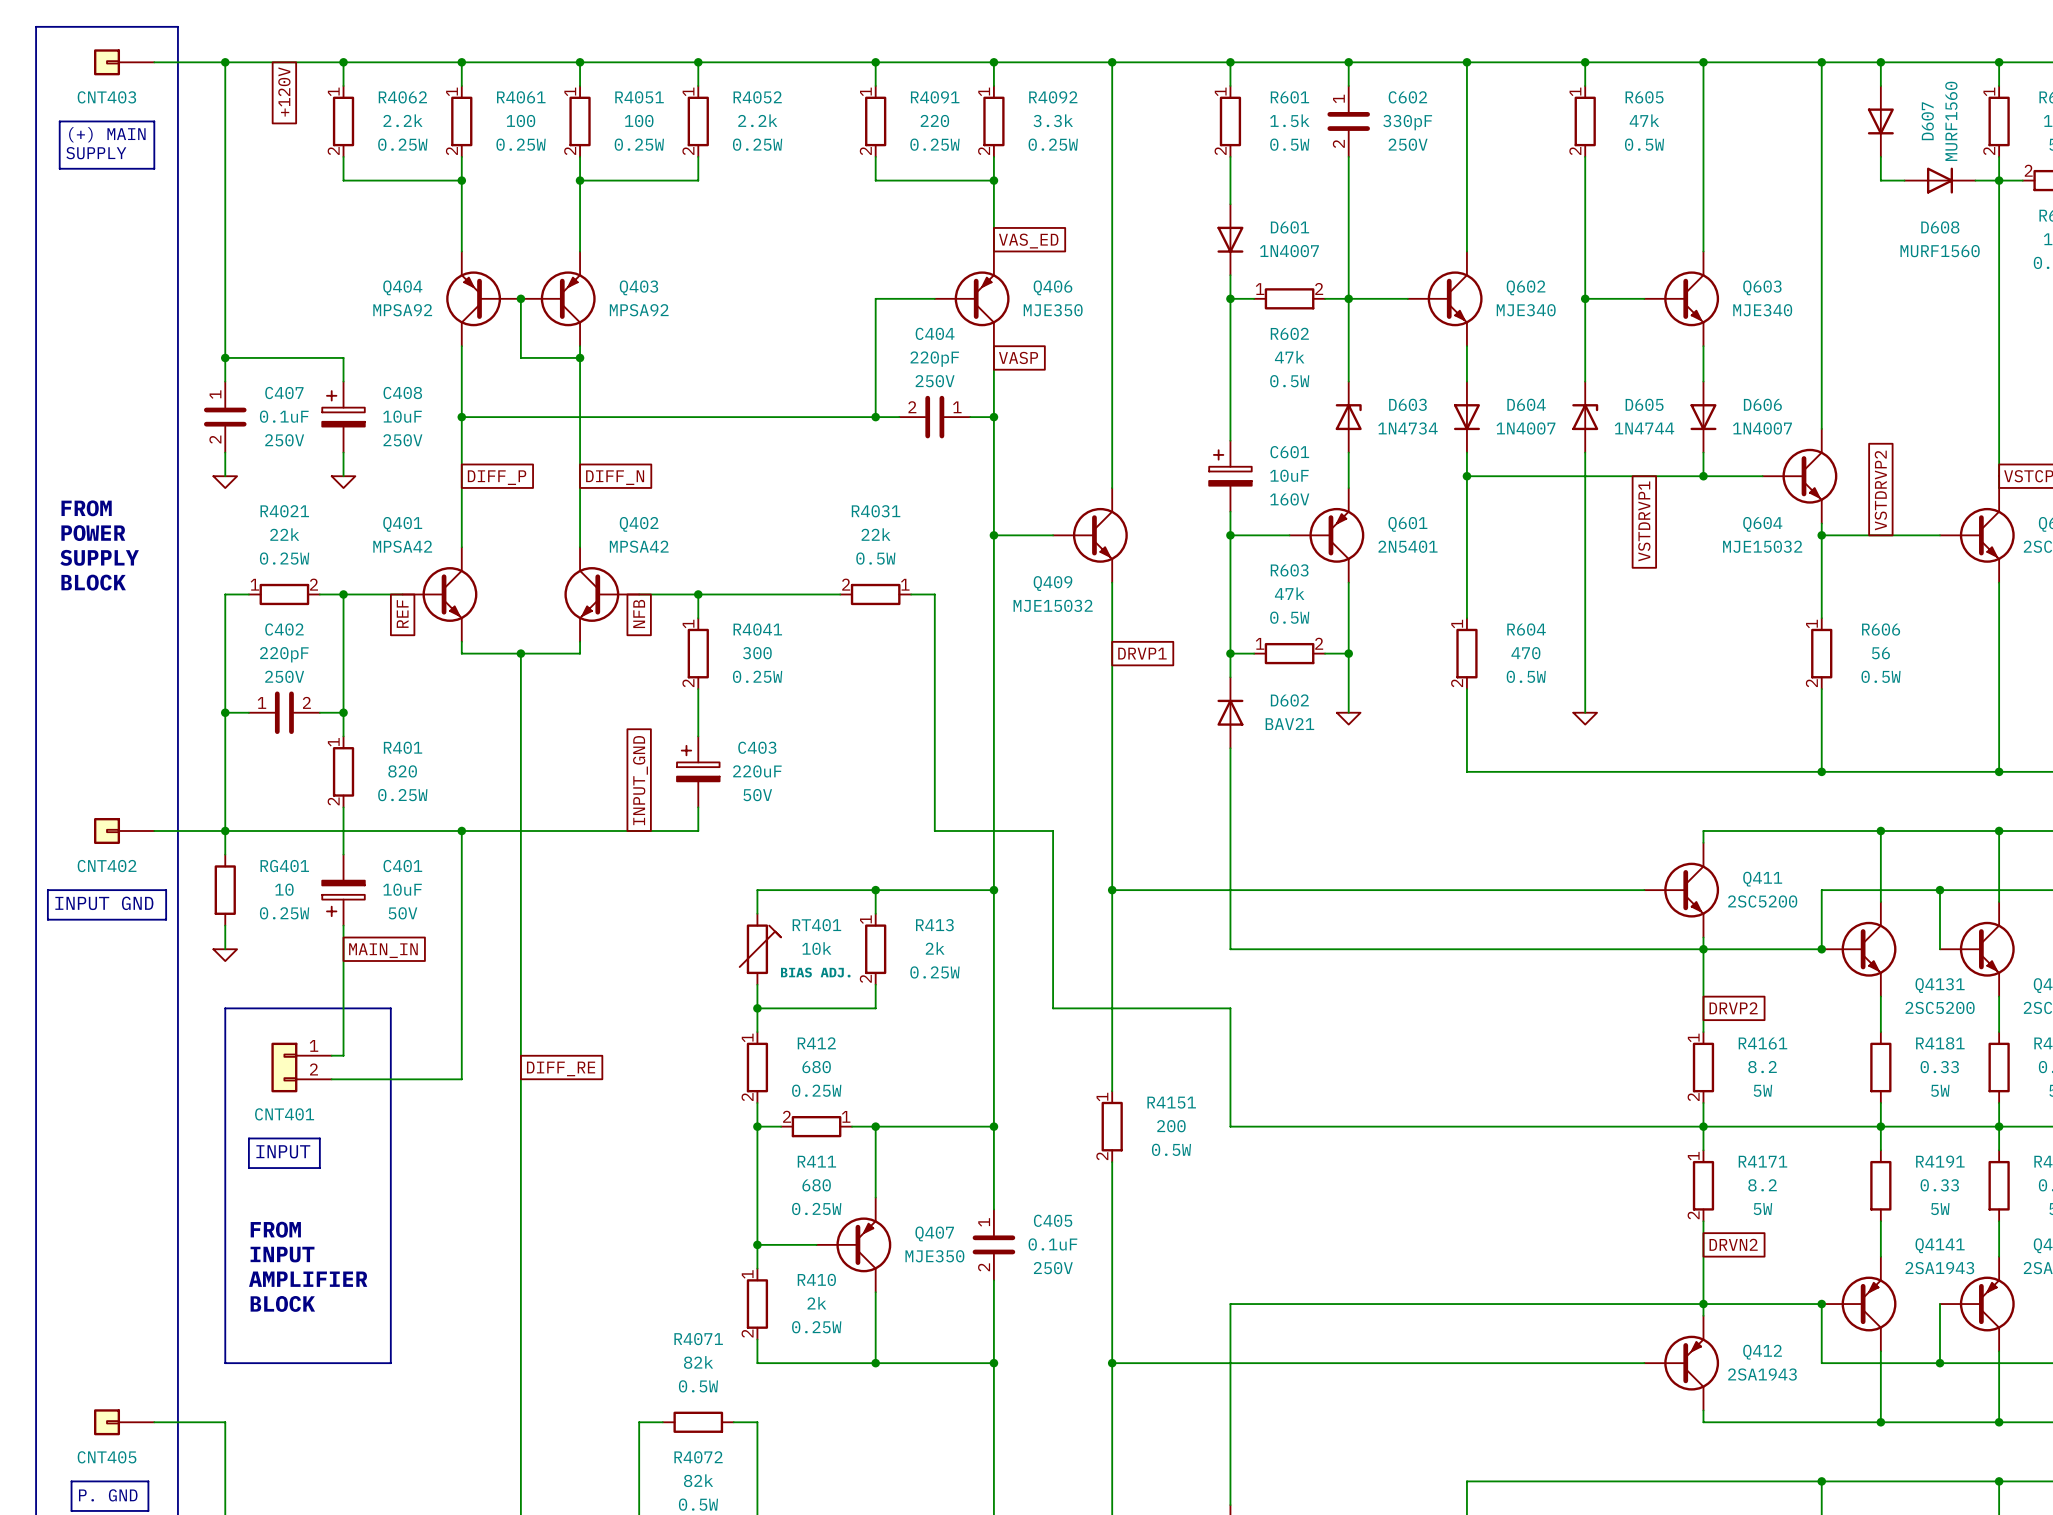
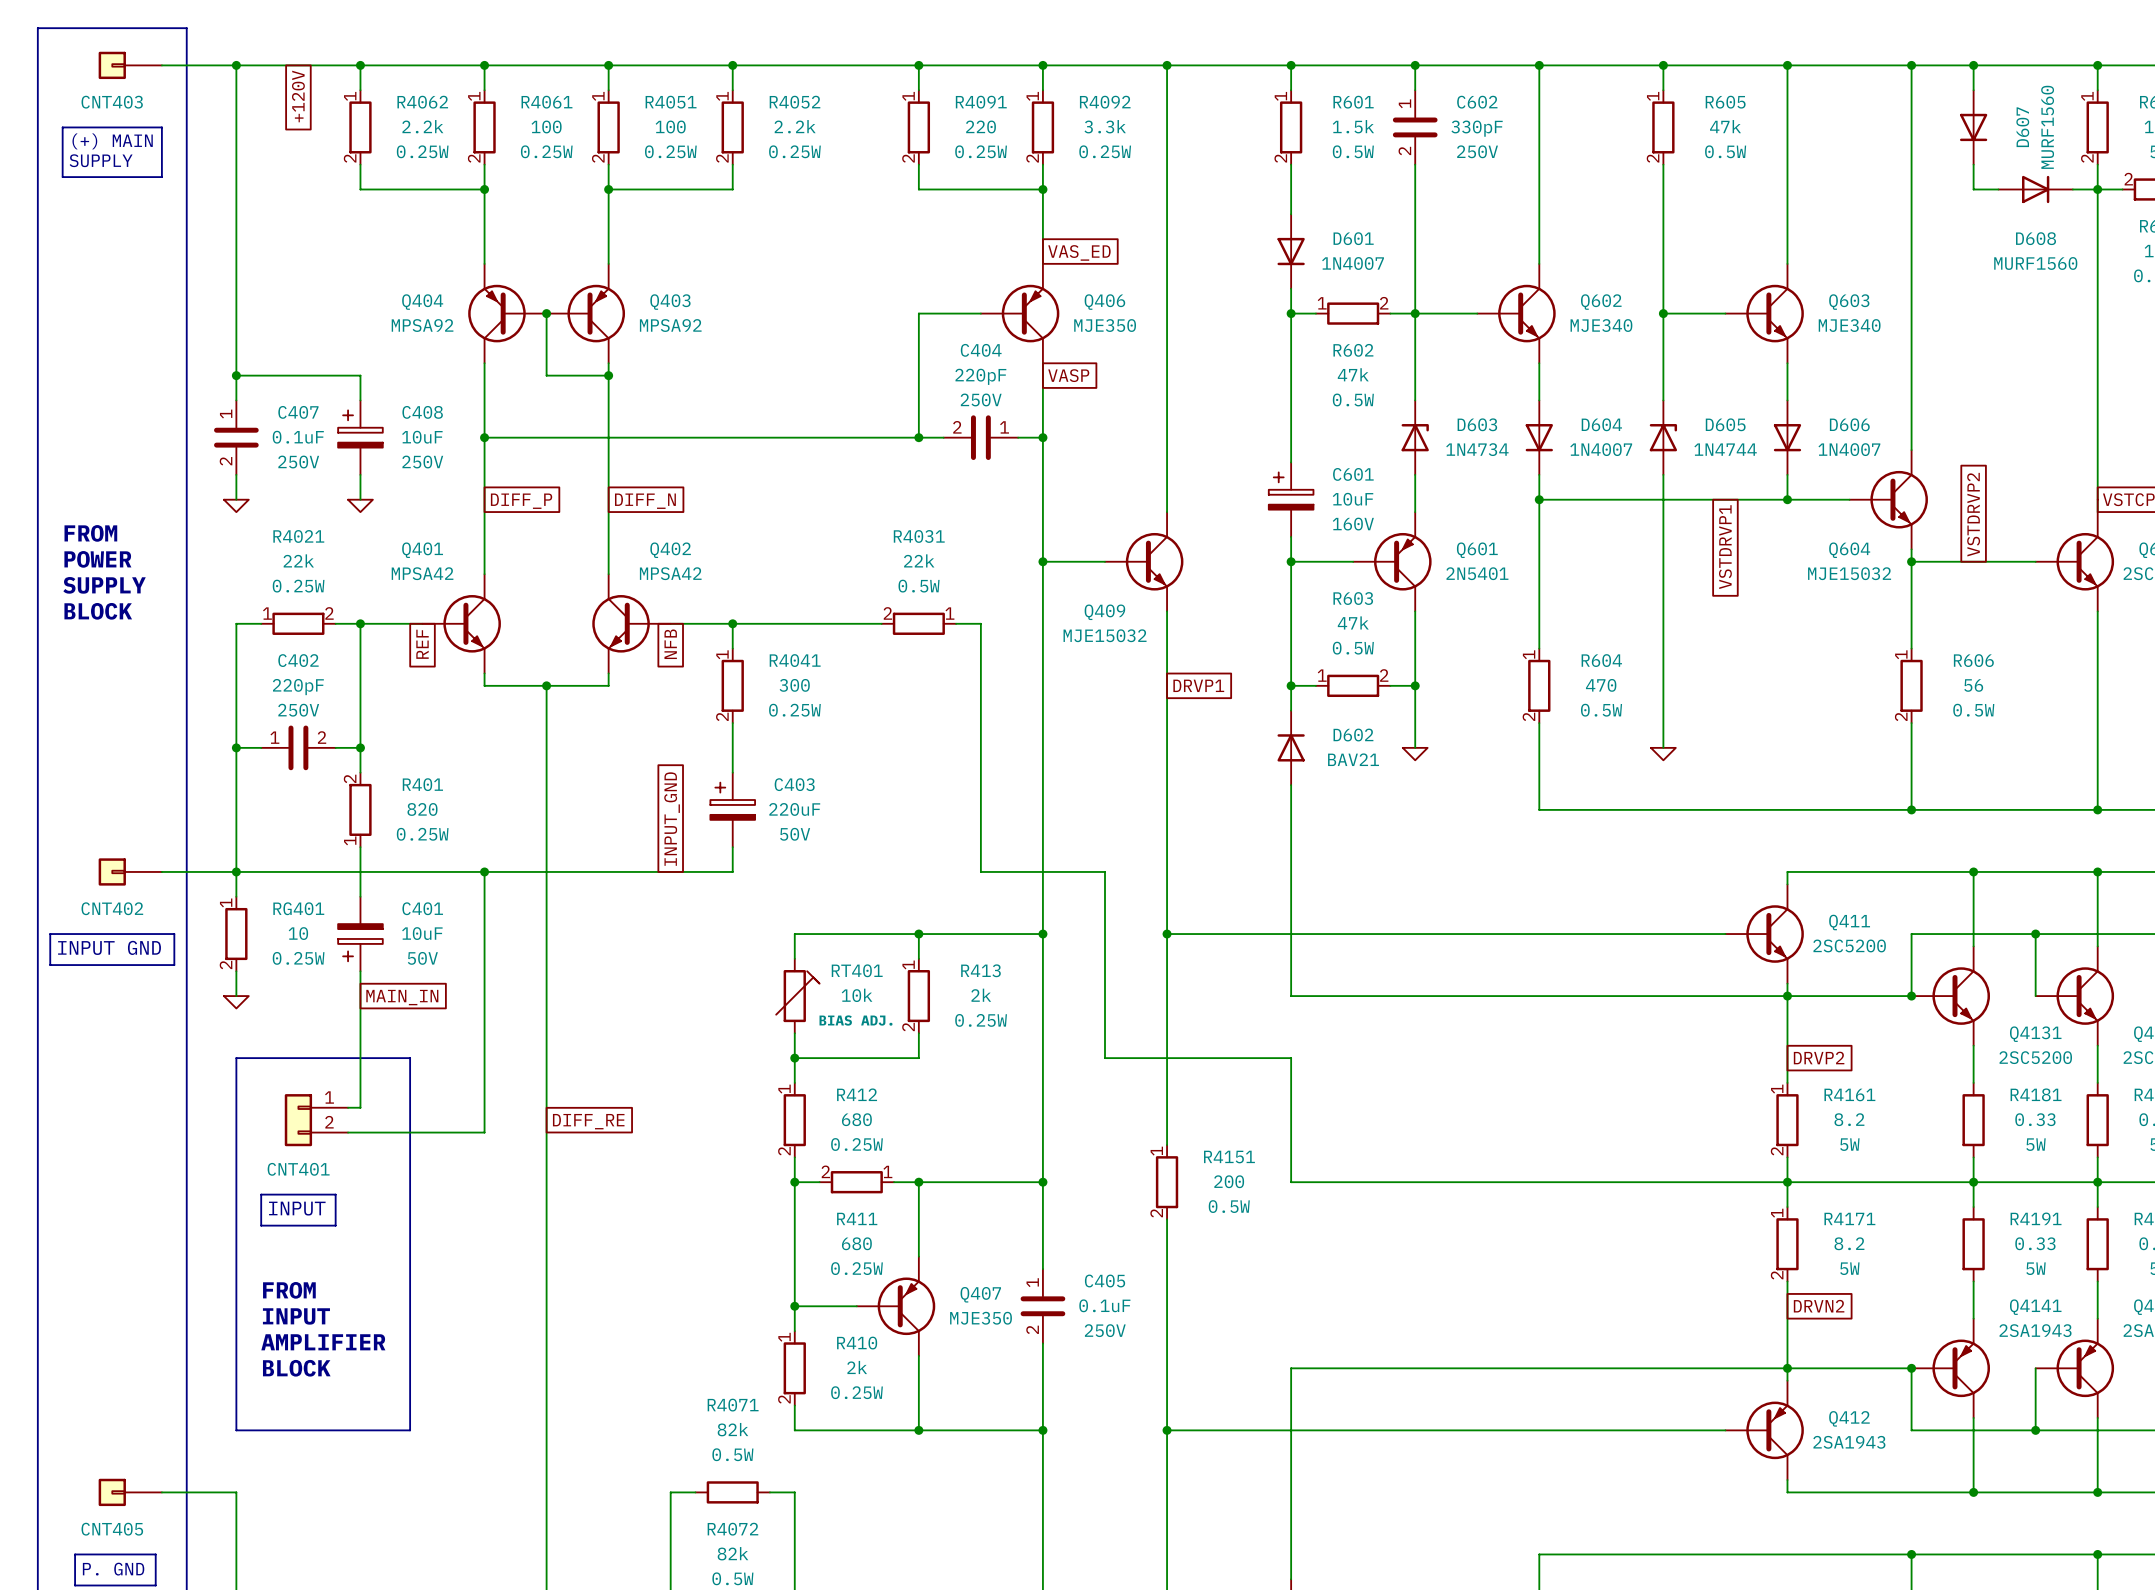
R401 rotation: 0° (343, 771) -> 180° (360, 809)
RG401 pin number: none -> 1 (226, 902)
RG401 pin number: none -> 2 (226, 965)

